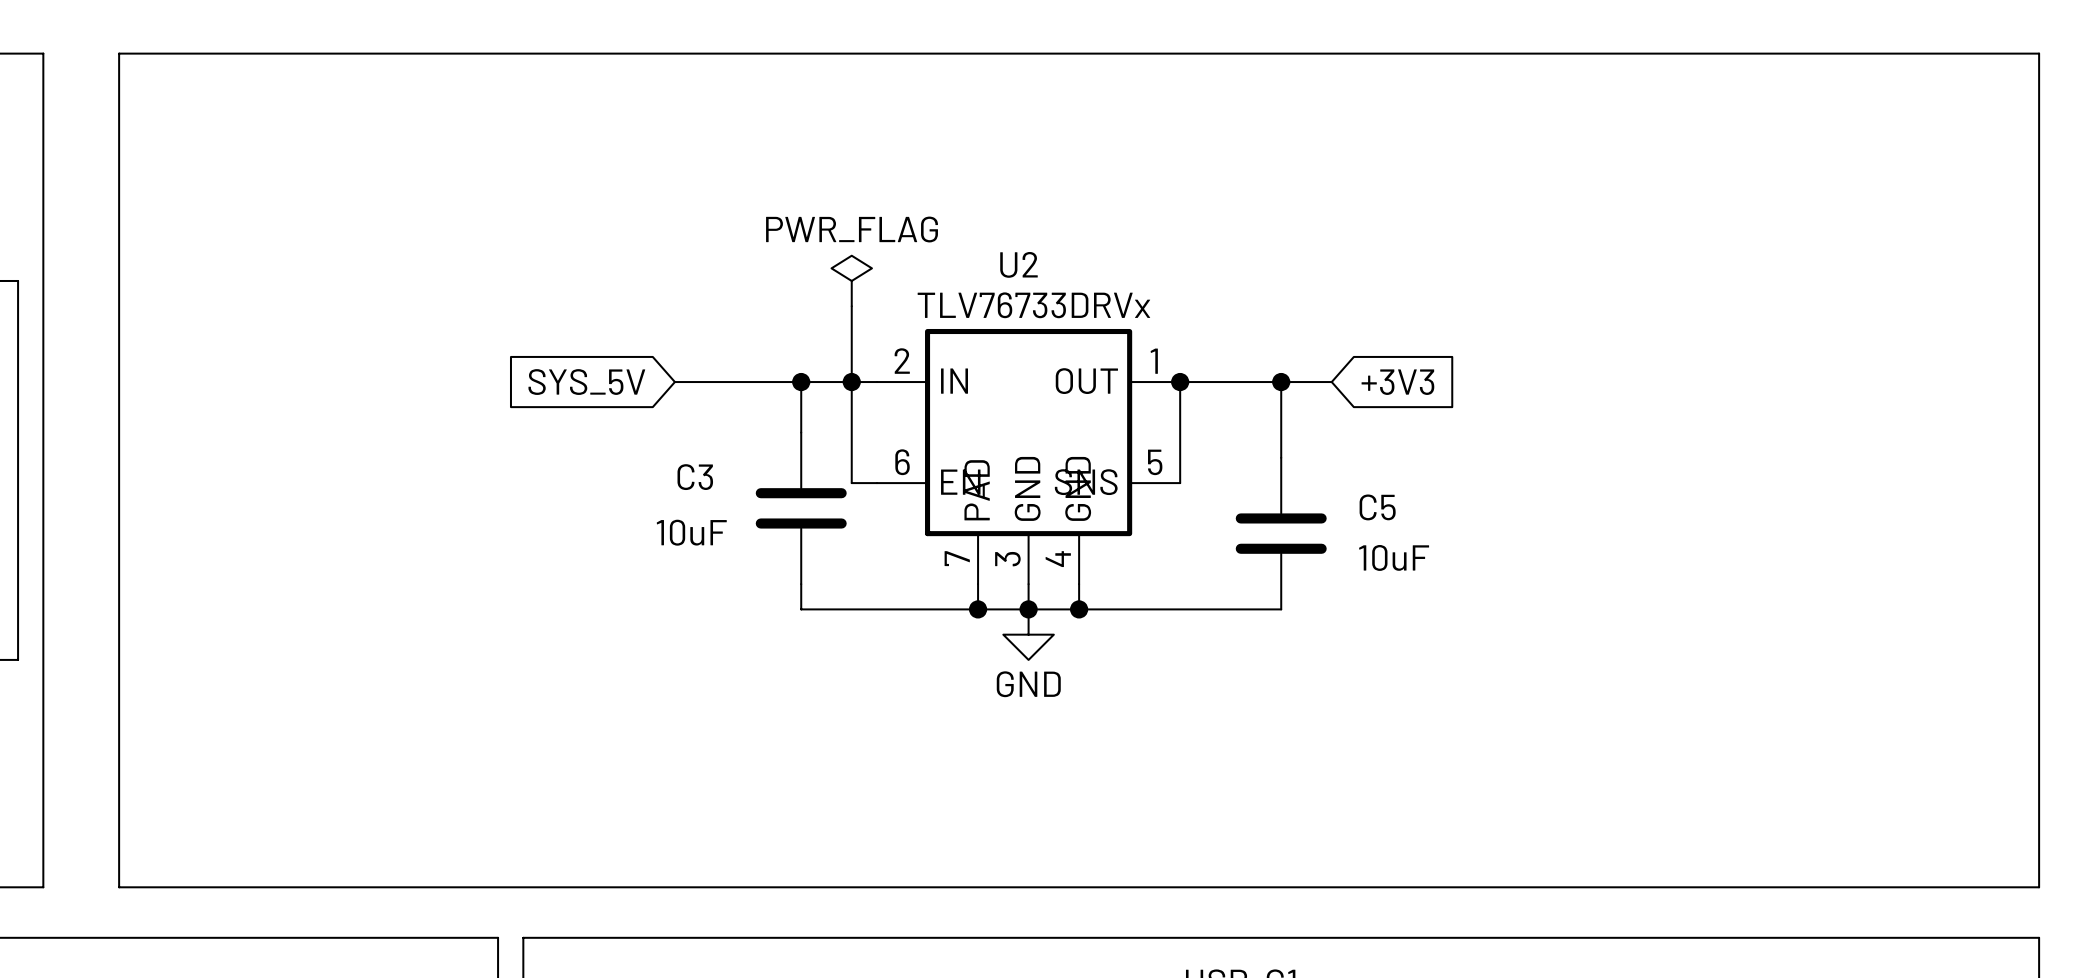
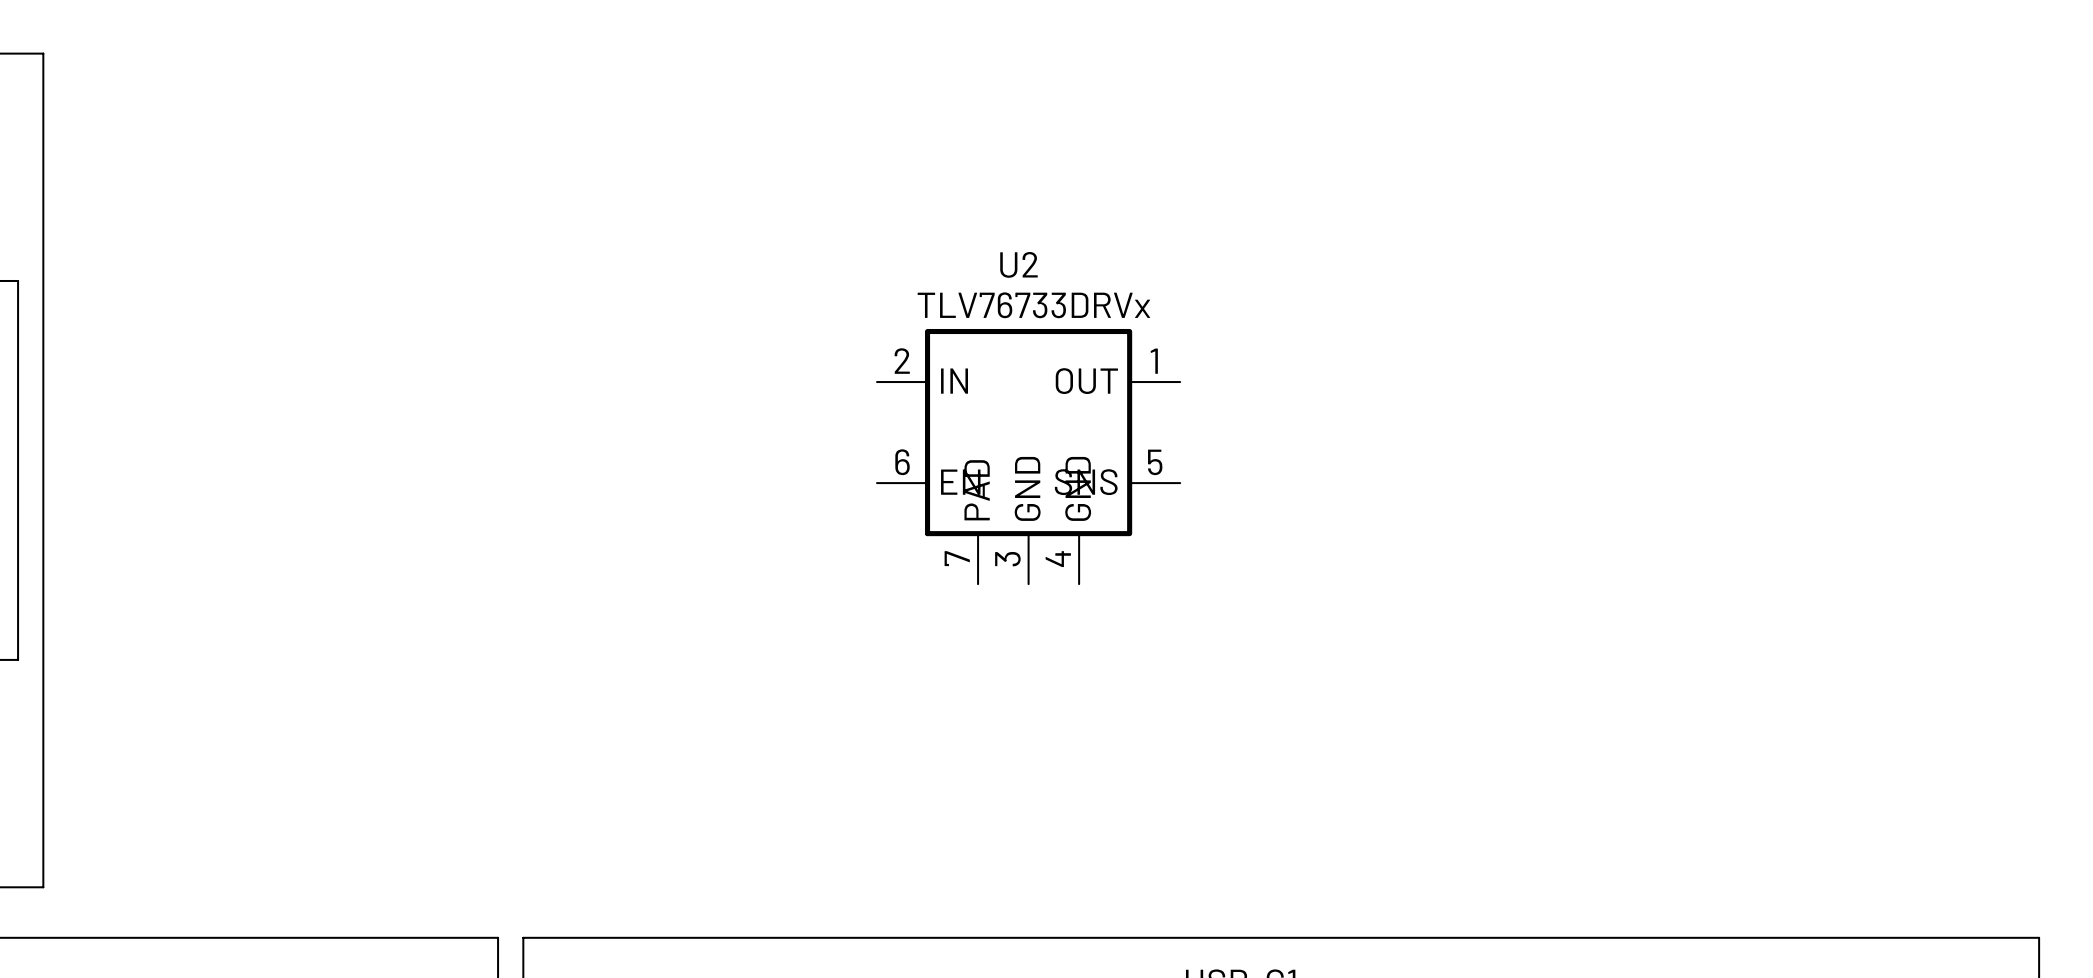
line: (119, 53) (2039, 53) (2039, 887) (119, 887) (119, 53) -> none
power symbol: PWR_FLAG (851, 280) -> none
wire: (851, 306) (851, 483) (877, 483) -> none
global label: SYS_5V (586, 382) -> none
wire: (674, 382) (877, 382) -> none
wire: (801, 382) (801, 432) -> none
junction: (801, 382) -> none
junction: (851, 382) -> none
junction: (1180, 382) -> none
wire: (1281, 382) (1281, 457) -> none
junction: (1281, 382) -> none
wire: (1331, 382) (1180, 382) (1180, 483) -> none
global label: +3V3 (1397, 382) -> none
C3: 10uF (801, 508) -> none
C5: 10uF (1281, 533) -> none
wire: (801, 584) (801, 609) (1281, 609) -> none
wire: (978, 584) (978, 609) -> none
wire: (1028, 584) (1028, 609) -> none
wire: (1079, 584) (1079, 609) -> none
junction: (978, 609) -> none
junction: (1028, 609) -> none
junction: (1079, 609) -> none
power symbol: GND (1028, 634) -> none

